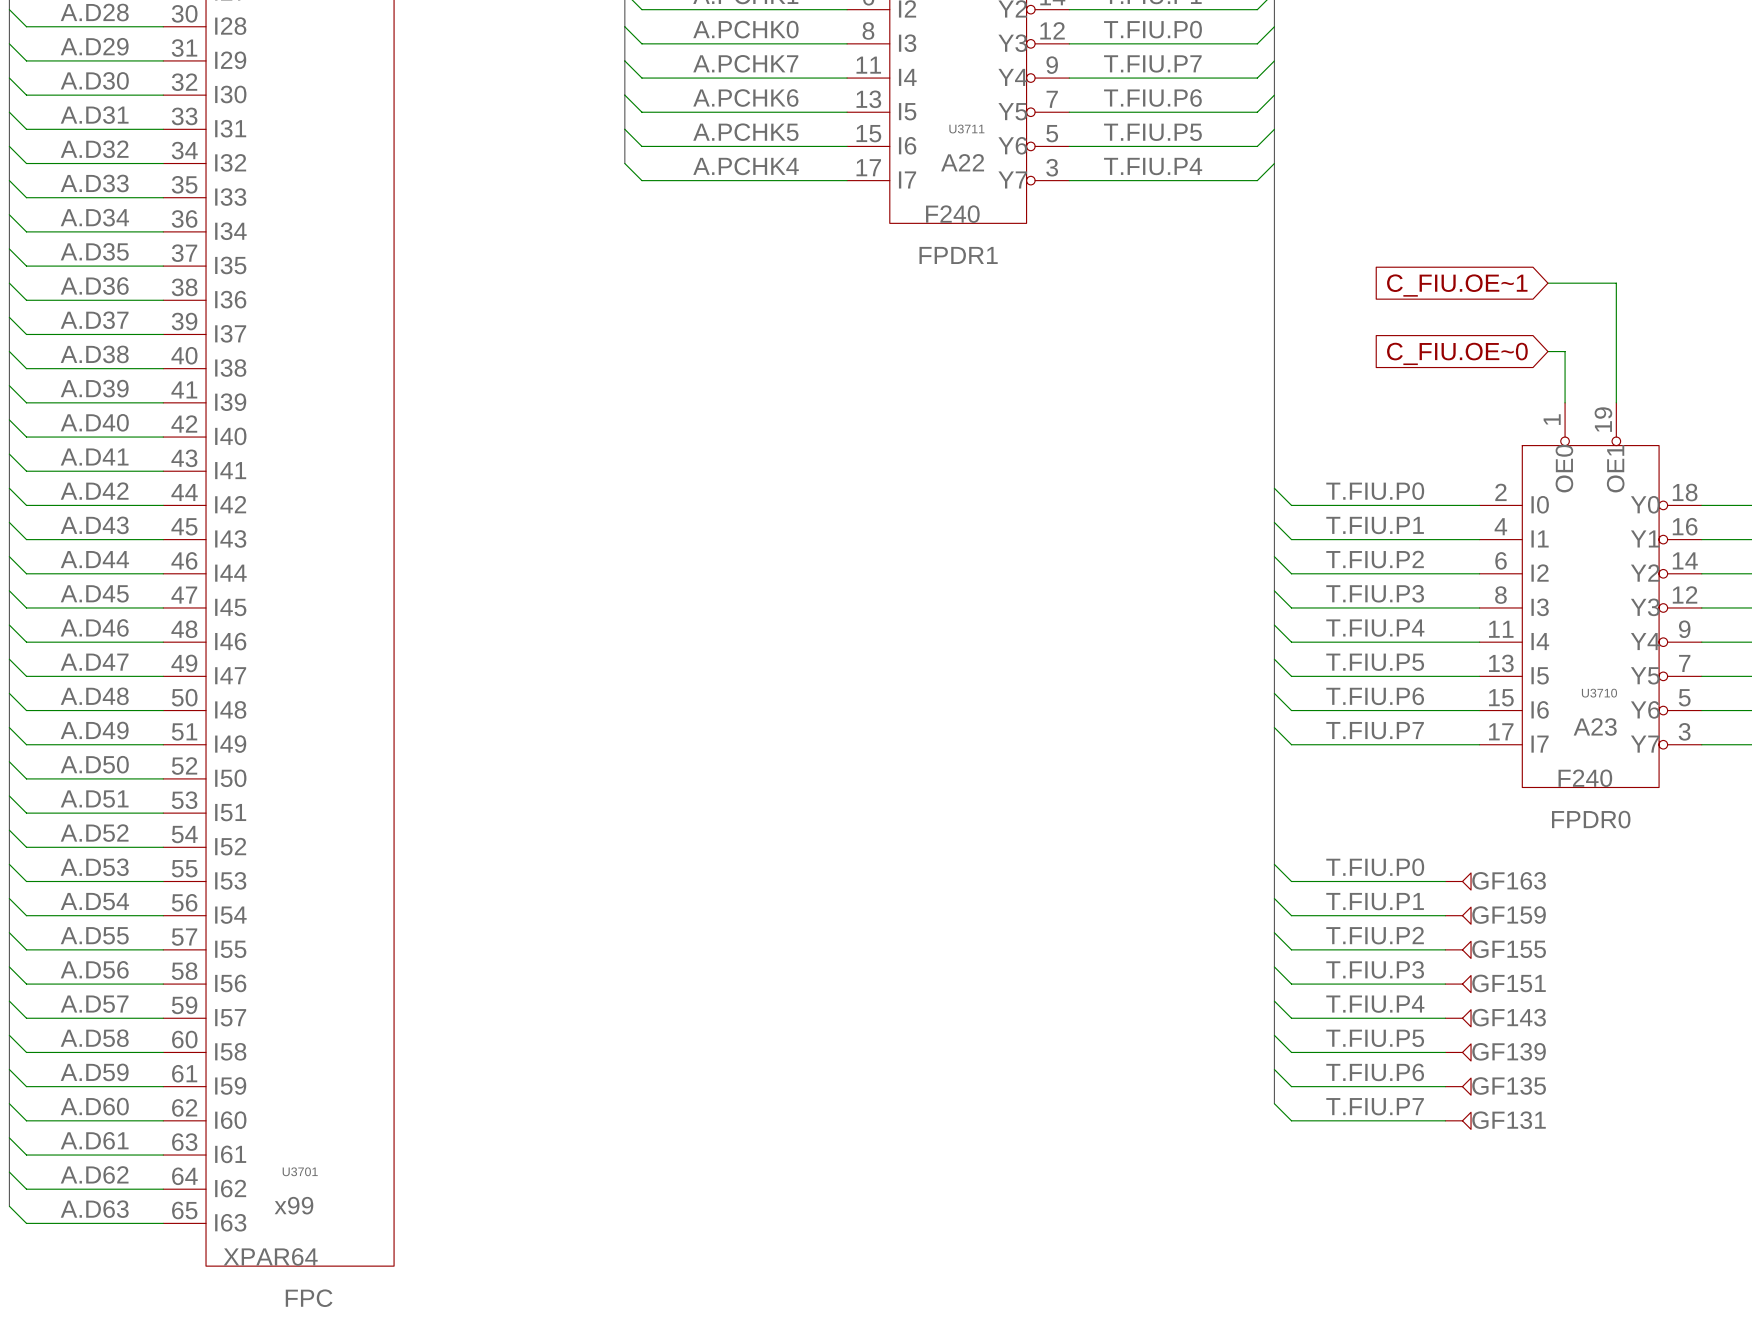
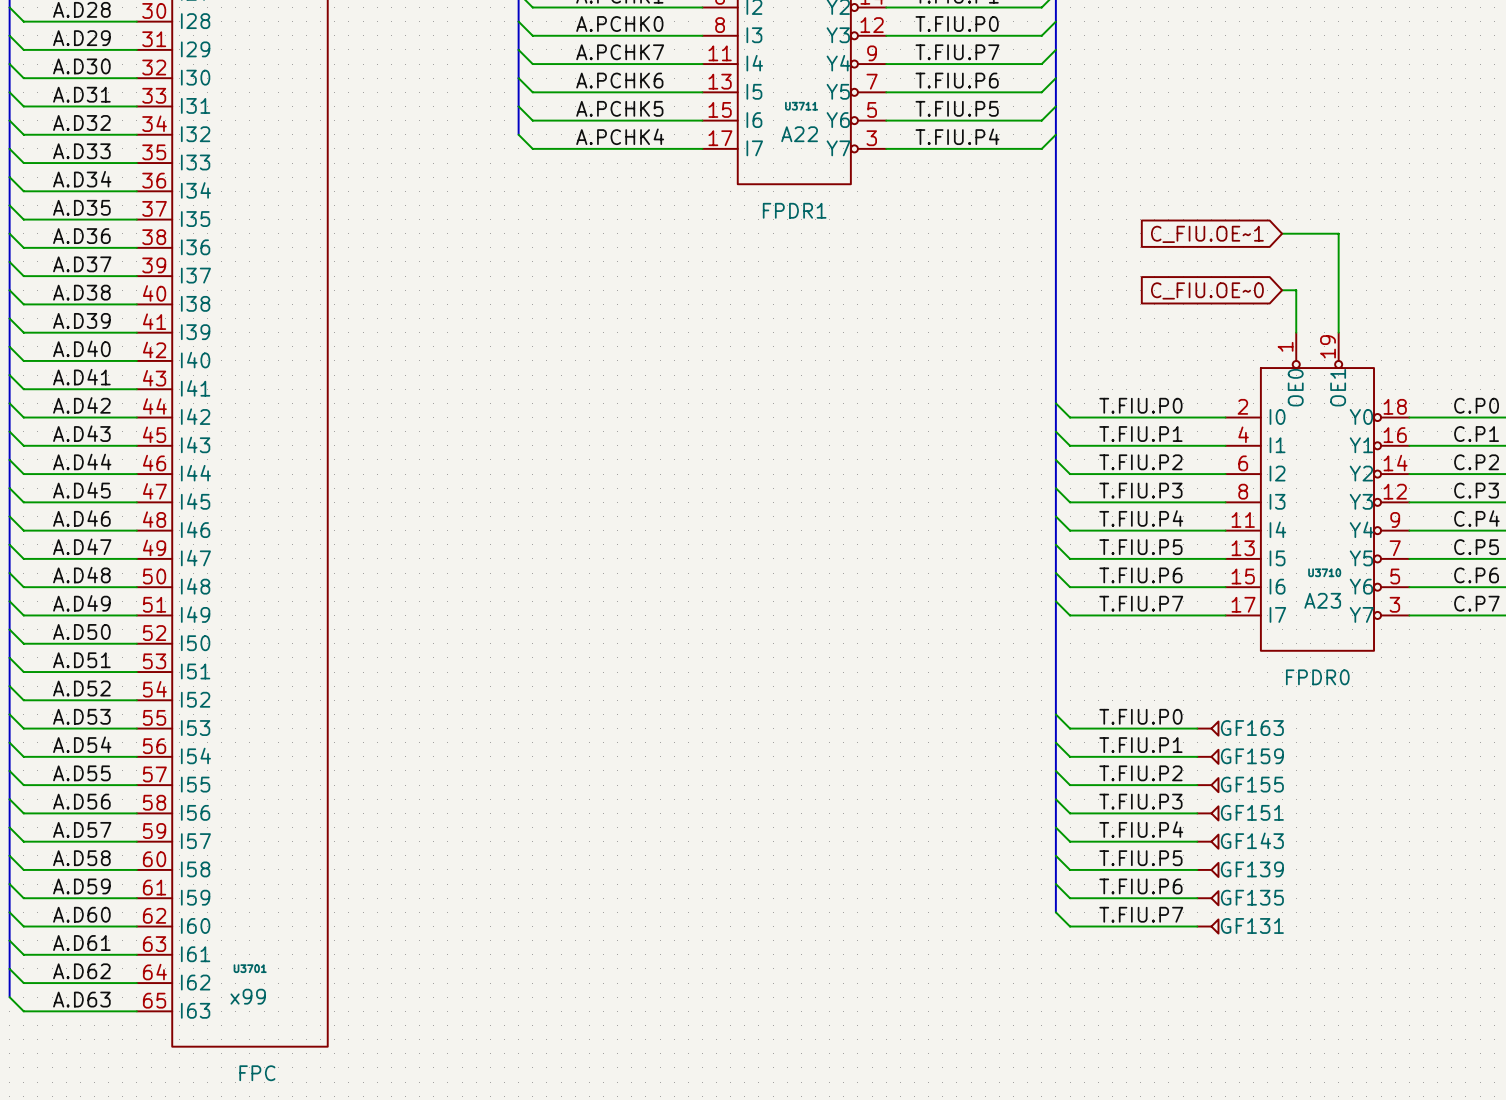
U3711 value: F240 (952, 214) -> none
U3710 value: F240 (1585, 778) -> none
U3701 value: XPAR64 (270, 1256) -> none

